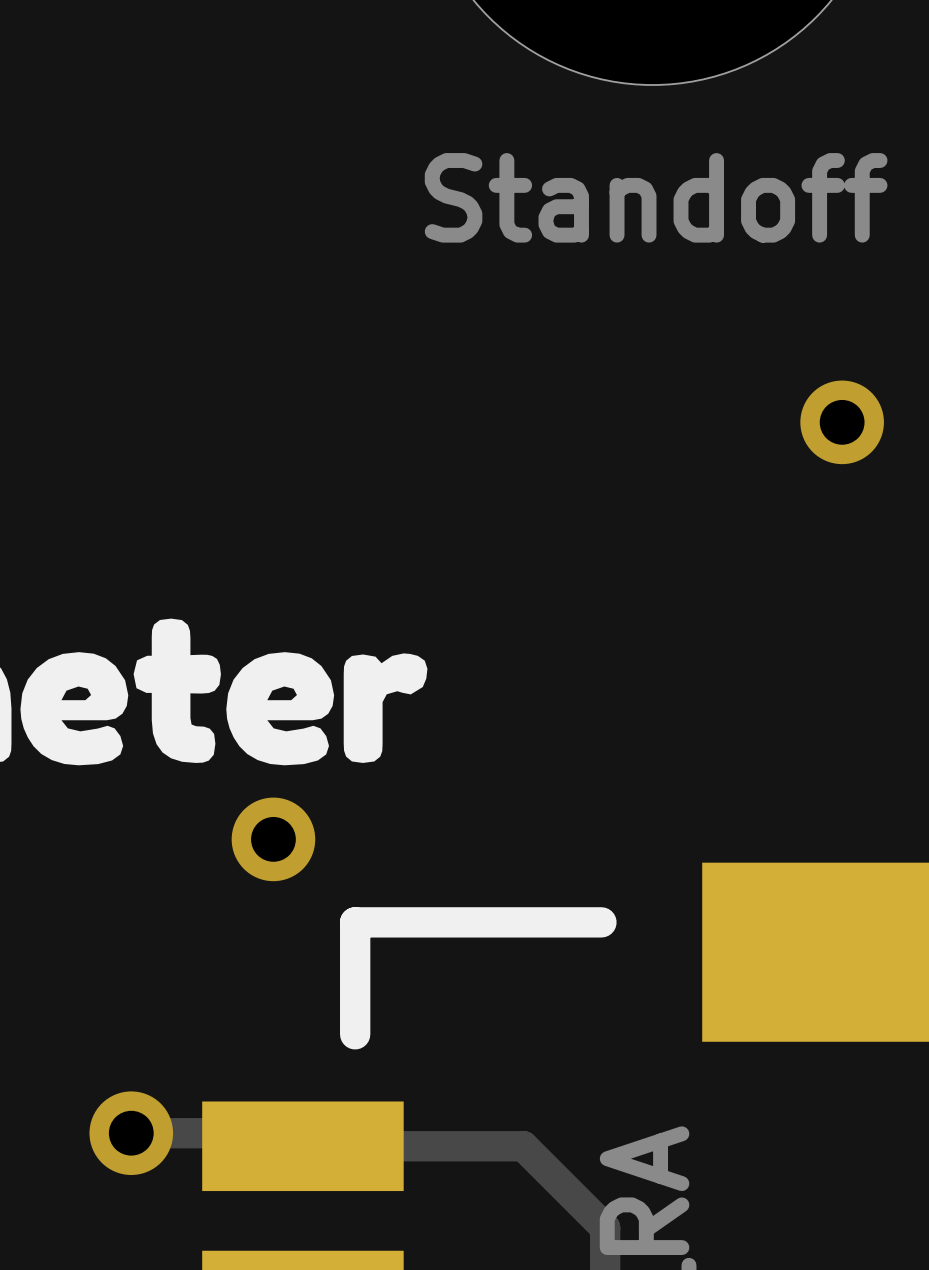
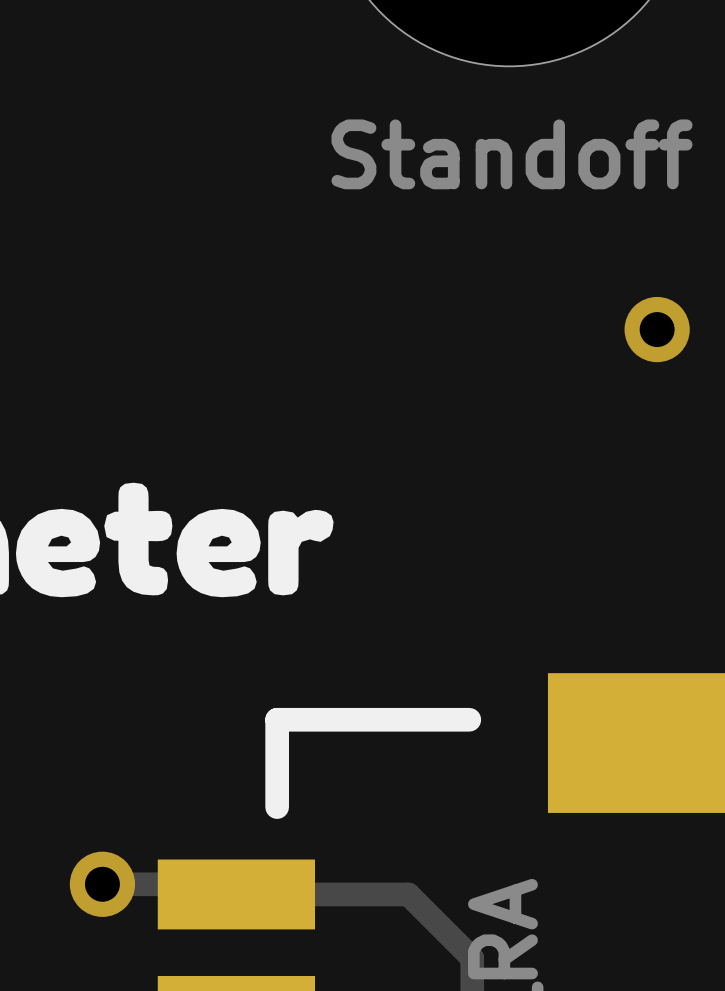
via: (273, 839) -> none

